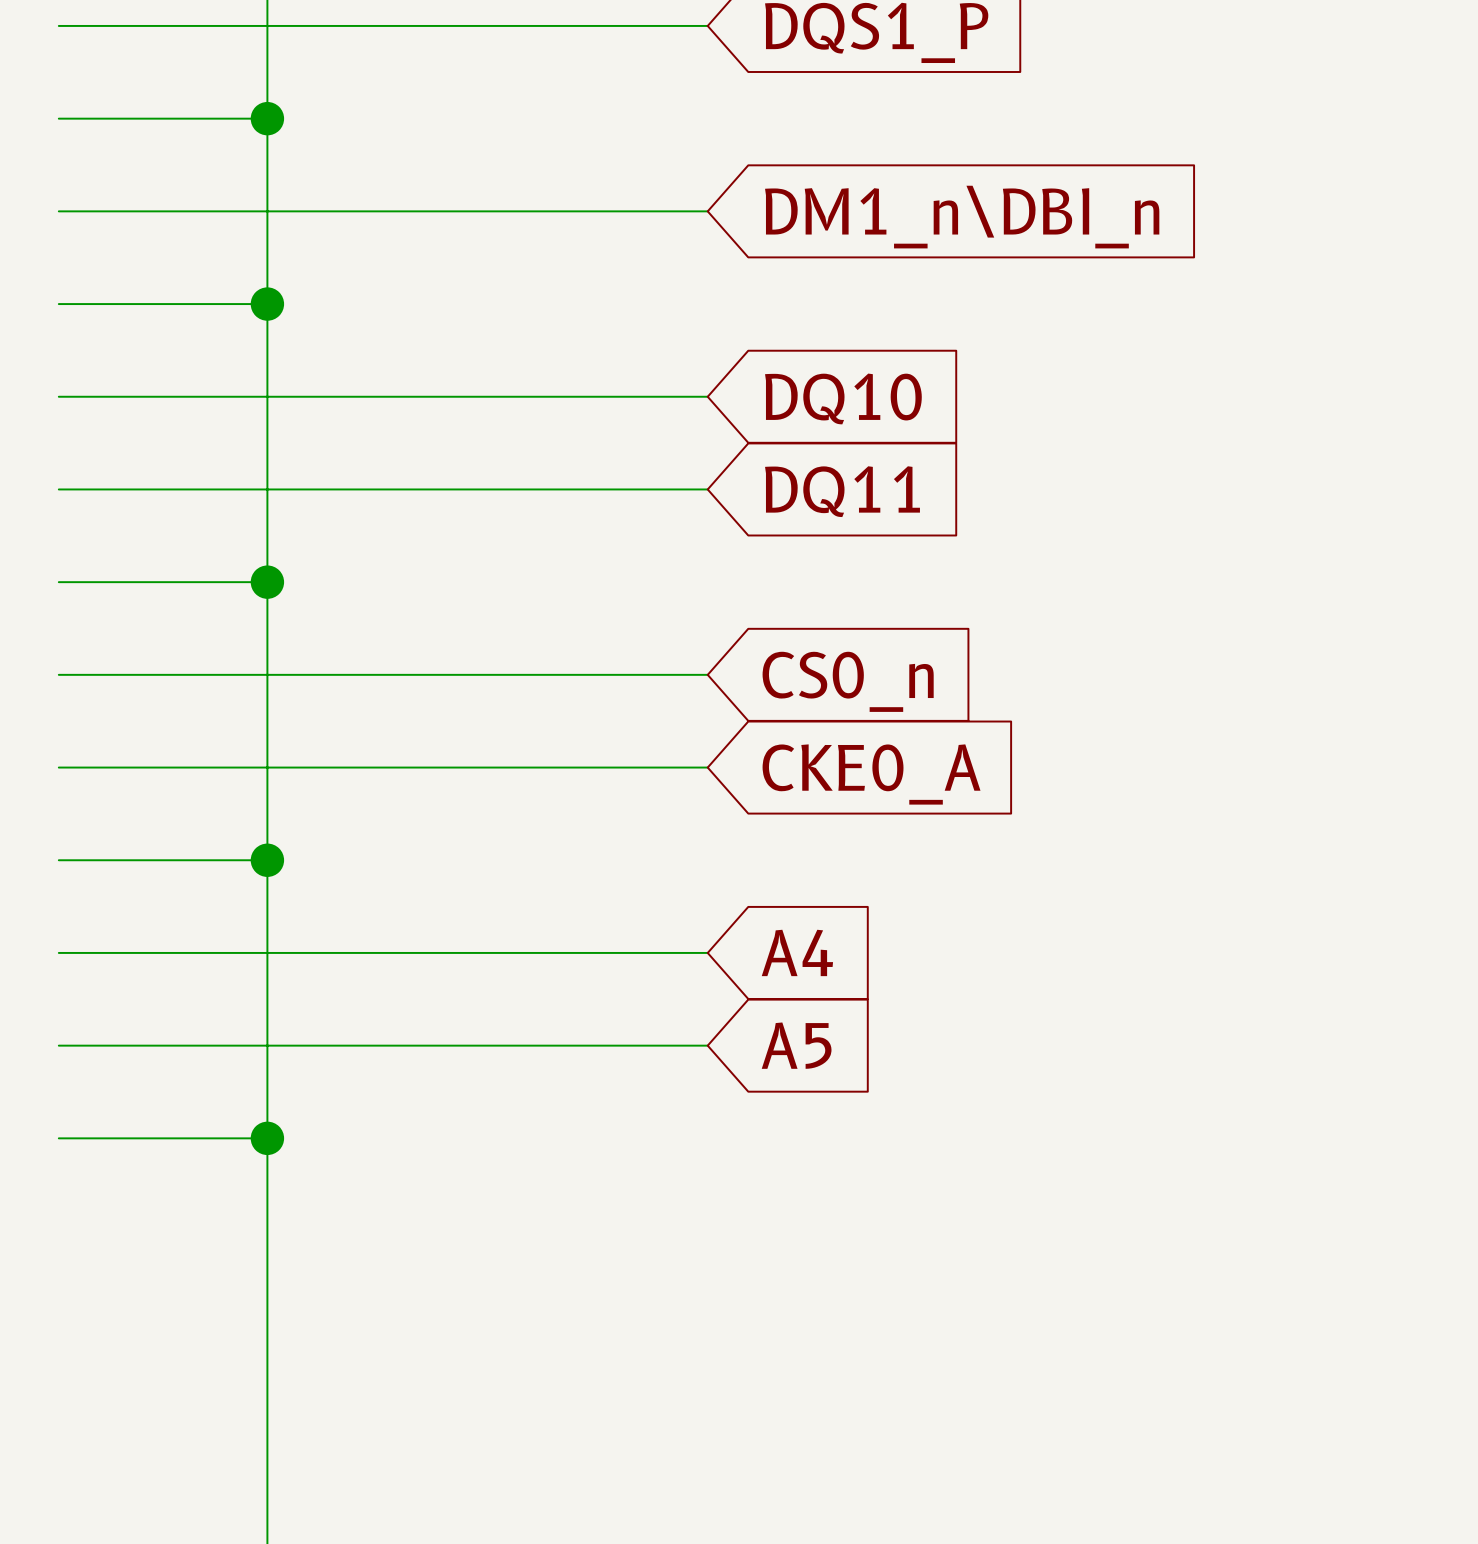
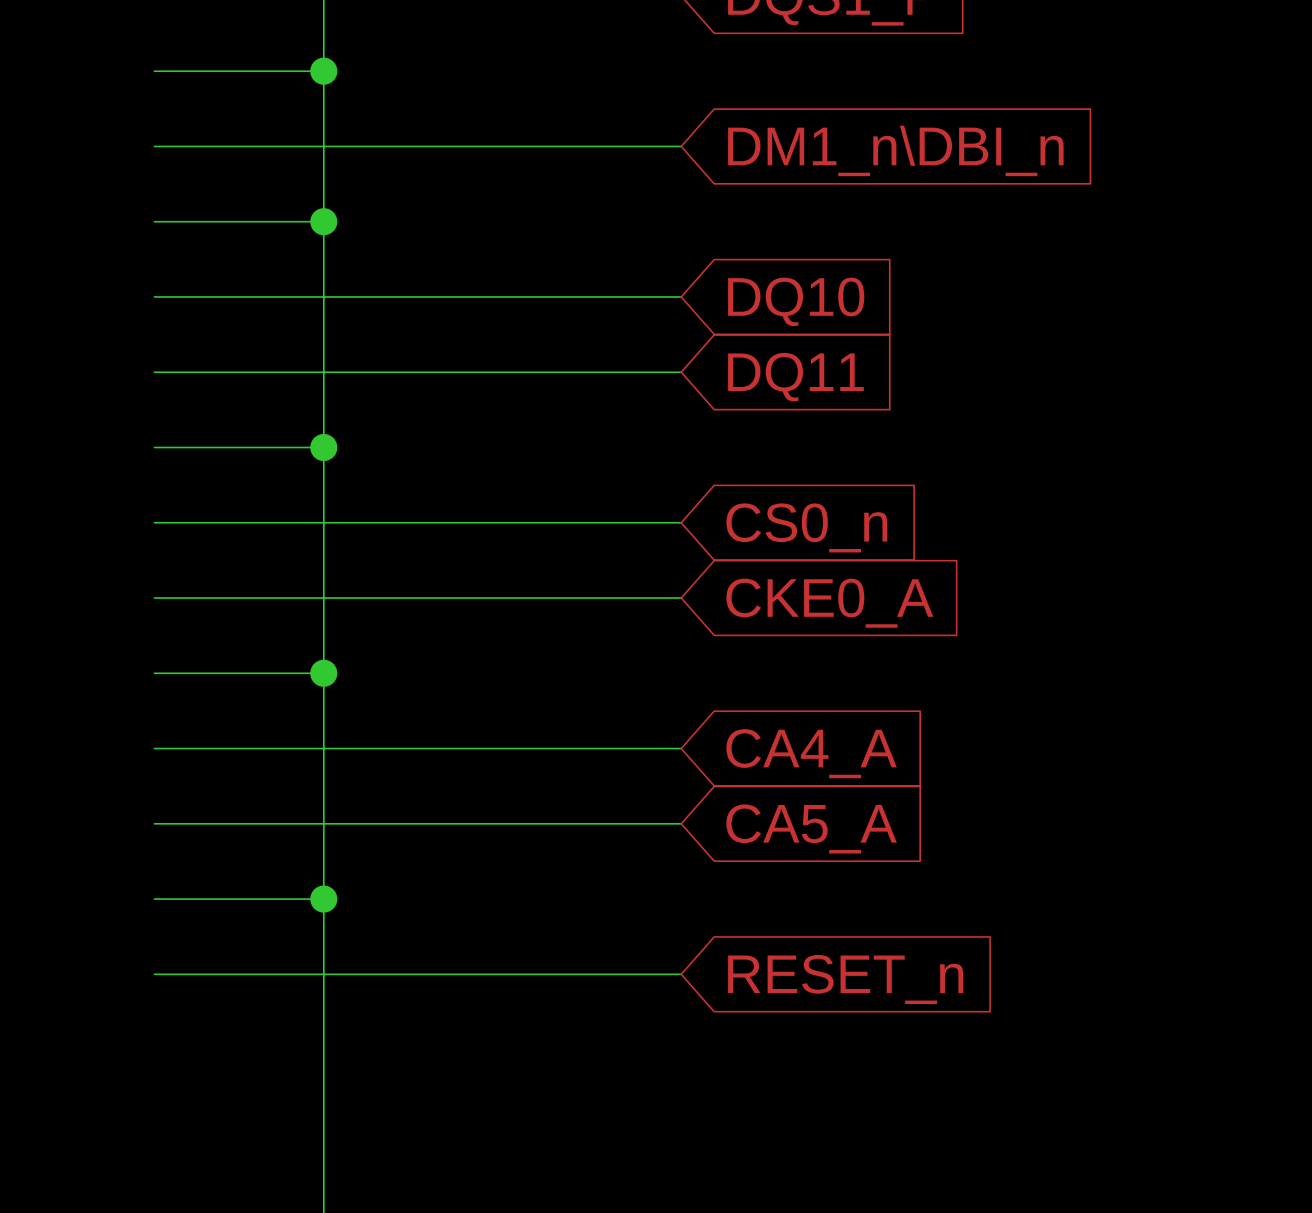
global label: A4 (797, 952) -> CA4_A (811, 753)
global label: A5 (796, 1045) -> CA5_A (811, 828)
wire: none -> (154, 974) (681, 974)
global label: none -> RESET_n (845, 979)

